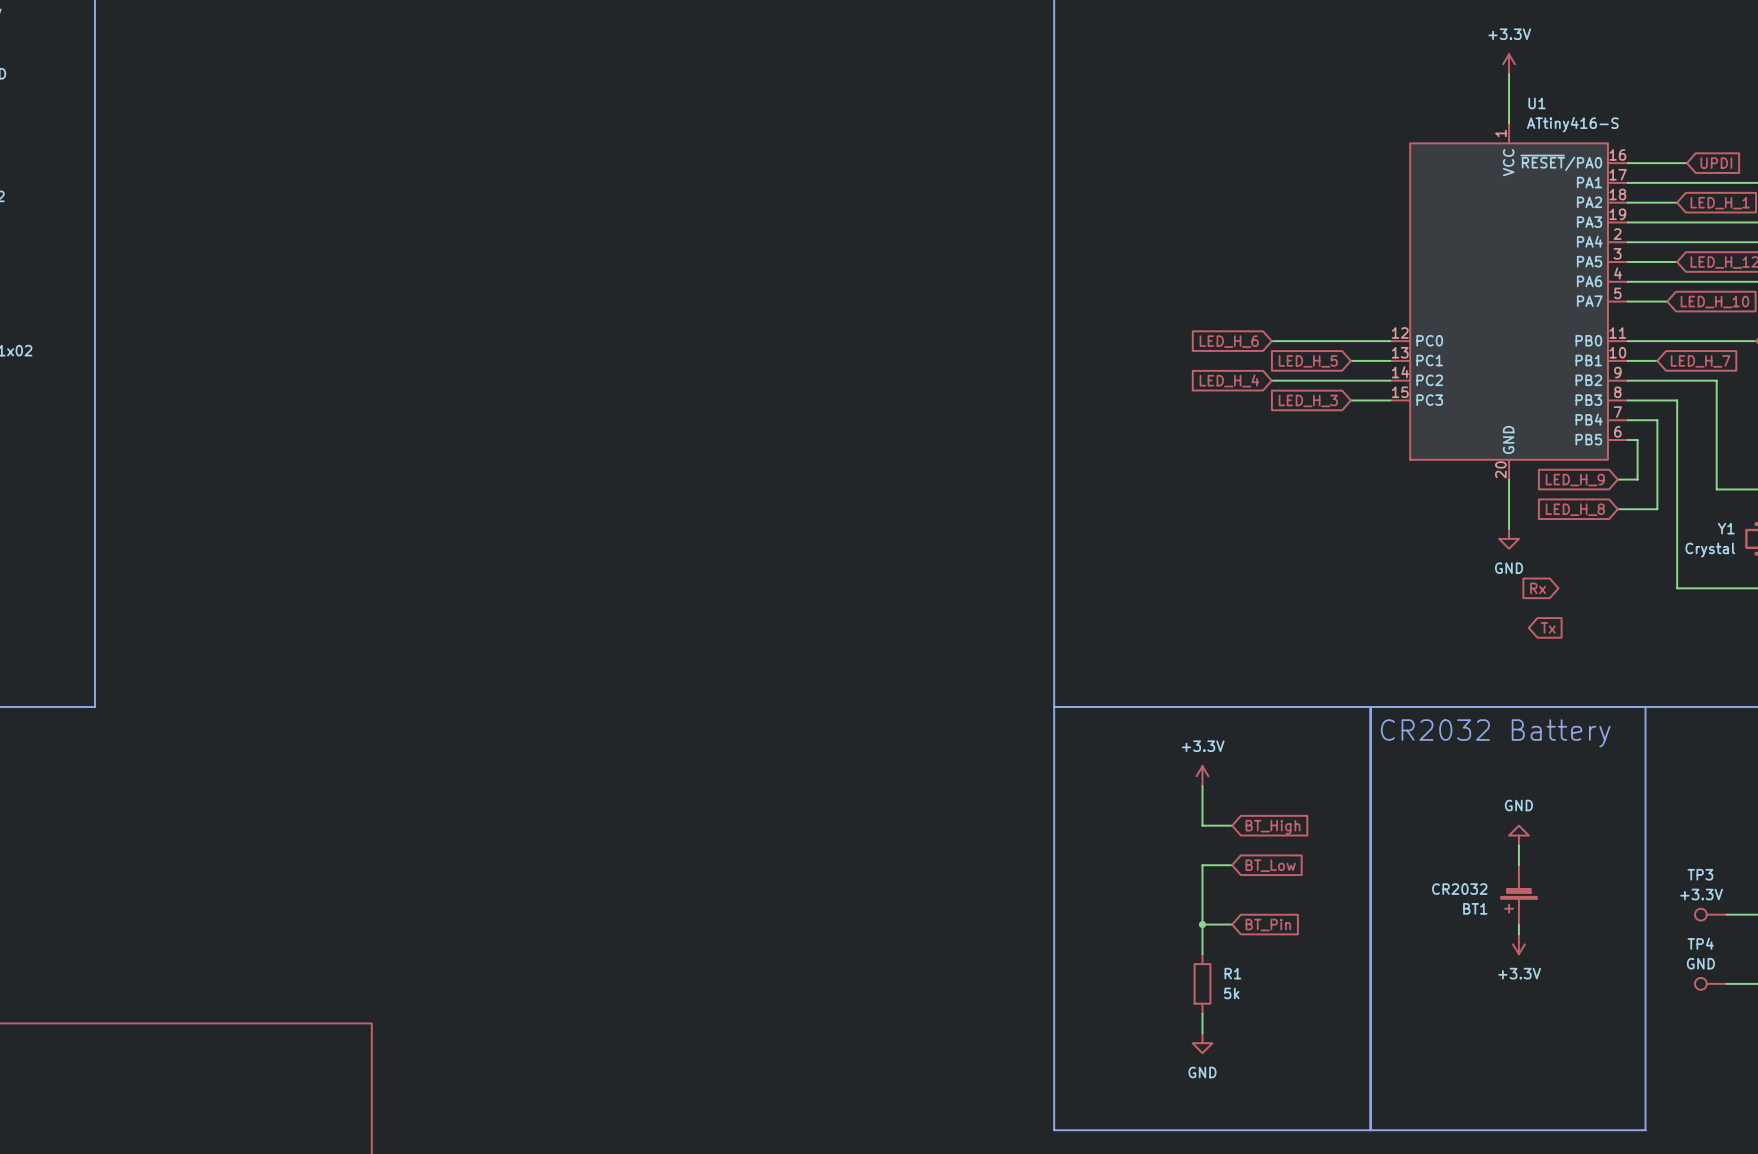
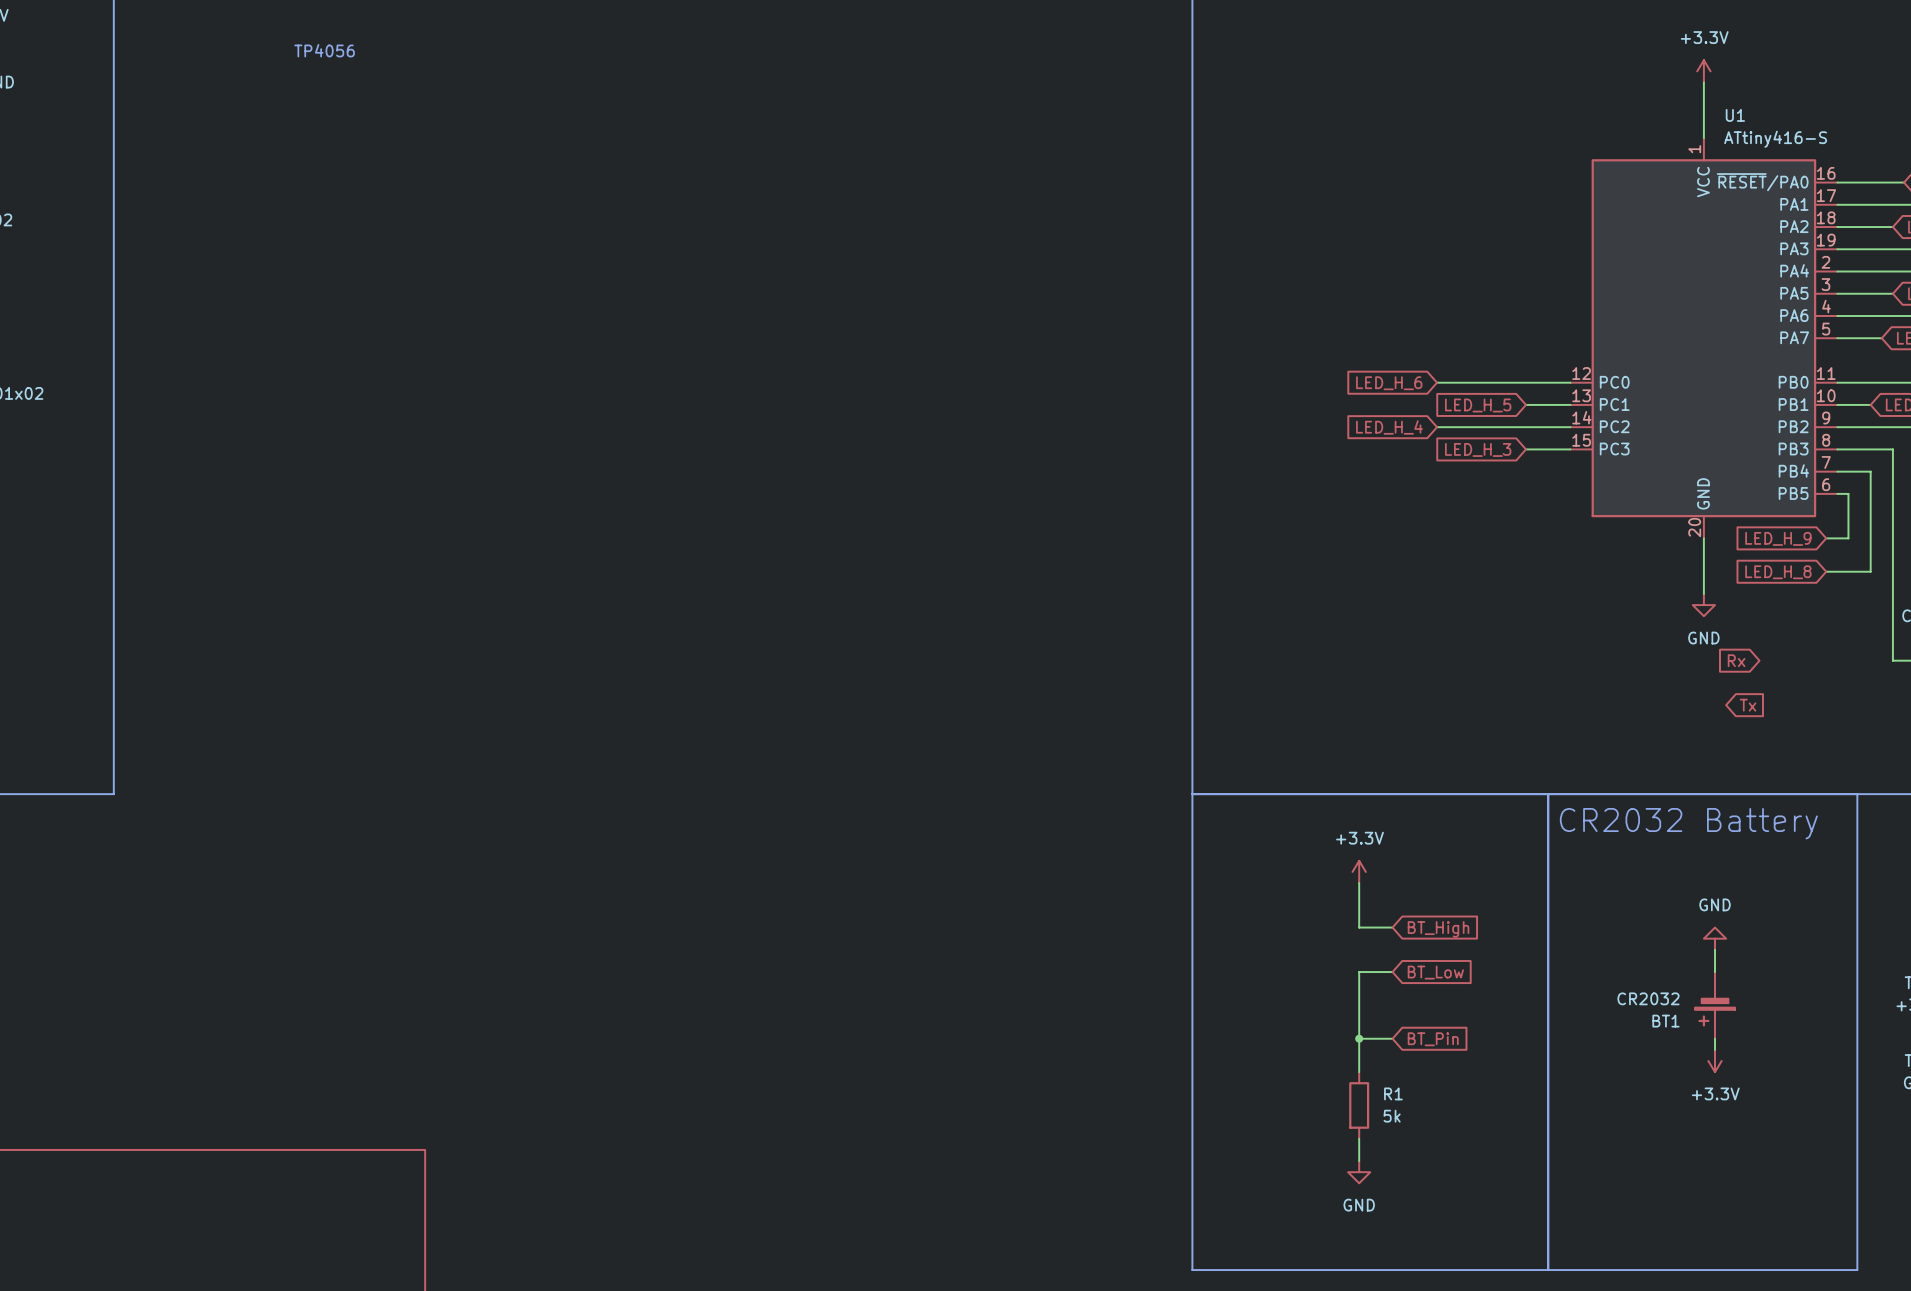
text: none -> TP4056 (324, 50)

